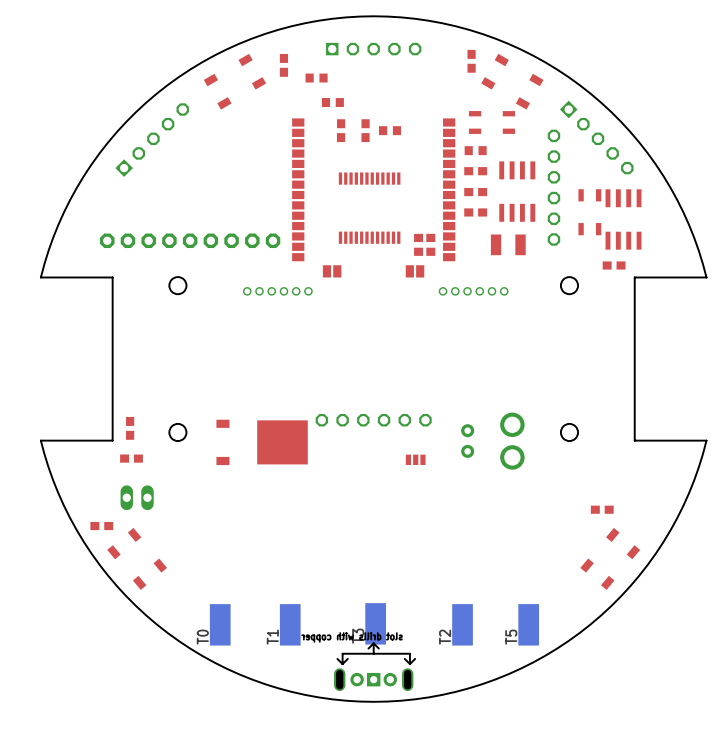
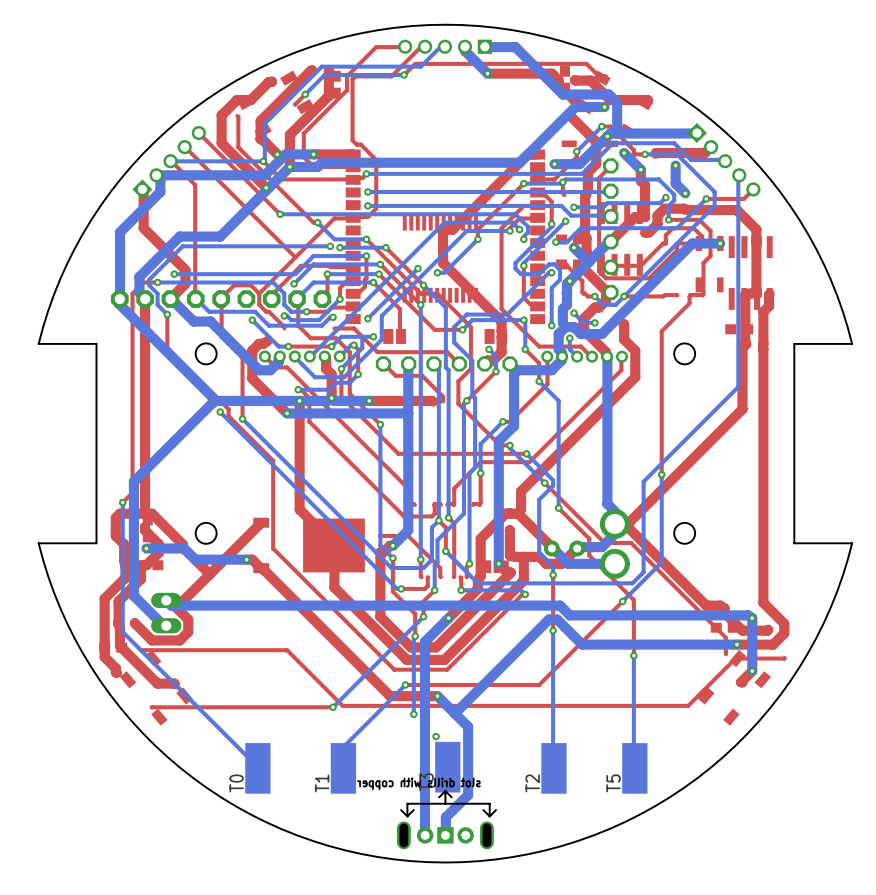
top track: none -> (405, 46) (376, 47) (346, 76) (346, 90) (303, 133) (303, 157) (313, 166) (353, 167)
top track: none -> (425, 46) (420, 47) (391, 76) (355, 76) (352, 79) (352, 140) (356, 144) (360, 144) (376, 159) (376, 208) (367, 217) (334, 218) (259, 293)
bottom track: none -> (445, 46) (440, 47) (420, 66) (321, 66) (264, 123) (263, 161) (170, 161)
part: none -> (445, 46)
bottom track: none -> (464, 46) (465, 51) (487, 73)
bottom track: none -> (484, 46) (515, 47) (562, 94) (608, 94) (617, 102) (617, 133)
part: (373, 49) -> none
top track: none -> (312, 70) (260, 120) (260, 139) (277, 154)
top track: none -> (329, 70) (328, 95) (289, 134) (289, 166)
top track: none -> (487, 73) (551, 73) (558, 80) (558, 84) (578, 104)
via: none -> (487, 73)
top track: none -> (404, 75) (415, 63) (586, 63) (599, 76) (605, 76)
bottom track: none -> (404, 75) (324, 75) (305, 94)
via: none -> (404, 75)
top track: none -> (574, 80) (590, 80) (610, 100) (648, 100)
top track: none -> (271, 81) (268, 81) (250, 100) (236, 100) (221, 115) (221, 143) (266, 187)
top track: none -> (305, 94) (295, 104)
via: none -> (305, 94)
part: (316, 78) -> none
bottom track: none -> (604, 107) (575, 107) (519, 162) (321, 162) (317, 166) (289, 166) (220, 236) (179, 236) (139, 276) (139, 292) (145, 299)
via: none -> (604, 107)
top track: none -> (569, 114) (596, 141) (596, 164) (587, 172) (587, 190) (585, 196) (583, 234) (586, 237) (586, 251) (583, 254) (583, 268) (607, 292) (610, 292) (599, 307) (594, 307) (583, 318) (583, 329) (606, 352) (607, 356)
top track: none -> (237, 115) (238, 147) (313, 222) (317, 222)
top track: none -> (601, 126) (610, 126) (633, 150) (634, 153) (645, 154)
bottom track: none -> (601, 126) (576, 151)
via: none -> (601, 126)
part: (332, 102) -> none
top track: none -> (198, 133) (280, 214)
bottom track: none -> (696, 133) (610, 133) (579, 164) (554, 164)
via: none -> (607, 136)
top track: none -> (184, 147) (295, 257)
top track: none -> (711, 147) (704, 153) (655, 153)
top track: none -> (576, 151) (576, 157) (554, 179) (537, 179)
via: none -> (576, 151)
bottom track: none -> (624, 153) (640, 169)
via: none -> (624, 153)
via: none -> (277, 154)
top track: none -> (313, 154) (353, 154)
bottom track: none -> (313, 154) (285, 154) (264, 175) (156, 175) (160, 179) (160, 191) (119, 232) (118, 303) (216, 400)
via: none -> (313, 154)
top track: none -> (537, 154) (528, 154) (452, 229) (442, 231) (443, 263) (501, 321) (501, 352) (493, 360) (487, 360) (484, 363)
bottom track: none -> (645, 154) (677, 154) (714, 191) (714, 205) (615, 304) (603, 304) (594, 296)
via: none -> (645, 154)
part: none -> (723, 159)
top track: none -> (170, 161) (195, 185) (195, 299)
bottom track: none -> (725, 161) (690, 159) (674, 143) (612, 143) (582, 173) (366, 173)
top track: none -> (263, 161) (281, 179) (353, 179) (353, 178) (362, 178) (366, 173)
via: none -> (263, 161)
part: none -> (169, 162)
part: (341, 130) -> none
part: (365, 130) -> none
part: (390, 130) -> none
via: none -> (554, 164)
top track: none -> (610, 165) (599, 178) (599, 271) (606, 278) (649, 278) (677, 250) (677, 243) (689, 243)
bottom track: none -> (675, 165) (675, 183) (685, 193)
via: none -> (675, 165)
via: none -> (289, 166)
top track: none -> (640, 169) (640, 180) (645, 185) (645, 217) (635, 217) (610, 241)
via: none -> (640, 169)
part: (596, 137) -> none
via: none -> (366, 173)
bottom track: none -> (739, 175) (738, 386) (643, 481) (643, 572) (632, 583) (477, 583) (445, 551)
part: (152, 140) -> none
top track: none -> (562, 182) (564, 195)
via: none -> (562, 182)
top track: none -> (523, 183) (477, 229) (477, 239)
bottom track: none -> (523, 183) (561, 183) (565, 179) (658, 179) (674, 194) (674, 200) (668, 205) (668, 219)
via: none -> (523, 183)
via: none -> (266, 187)
part: (475, 150) -> none
top track: none -> (142, 189) (143, 228) (185, 269) (185, 283) (170, 299)
top track: none -> (753, 189) (743, 198) (706, 198)
bottom track: none -> (610, 191) (367, 191)
via: none -> (367, 191)
top track: none -> (537, 192) (543, 193) (551, 201) (551, 224)
via: none -> (685, 193)
bottom track: none -> (665, 197) (660, 203) (607, 203) (603, 207) (573, 207)
via: none -> (665, 197)
bottom track: none -> (706, 198) (677, 228) (580, 228) (567, 242) (555, 242)
via: none -> (706, 198)
top track: none -> (537, 205) (523, 205) (501, 228) (501, 308) (539, 346) (580, 346) (592, 356)
bottom track: none -> (367, 205) (561, 205) (571, 215) (610, 216)
via: none -> (367, 205)
via: none -> (573, 207)
bottom track: none -> (280, 214) (515, 214) (528, 226) (528, 232) (523, 239)
via: none -> (280, 214)
part: (475, 171) -> none
top track: none -> (537, 217) (519, 218) (509, 228) (509, 230)
top track: none -> (668, 219) (699, 219) (710, 230) (710, 256) (703, 263) (702, 295) (689, 295) (689, 303) (661, 331) (661, 474)
via: none -> (668, 219)
bottom track: none -> (565, 221) (523, 263) (523, 265)
via: none -> (565, 221)
bottom track: none -> (317, 222) (334, 239) (366, 239)
via: none -> (317, 222)
bottom track: none -> (551, 224) (551, 226) (515, 263) (515, 268) (521, 274) (539, 274) (548, 264) (554, 264) (560, 269) (560, 279) (551, 288) (551, 325)
via: none -> (551, 224)
bottom track: none -> (519, 229) (512, 222) (444, 222) (309, 356)
via: none -> (519, 229)
bottom track: none -> (509, 230) (466, 230) (381, 315) (381, 339) (344, 377) (314, 377) (294, 356)
via: none -> (509, 230)
top track: none -> (645, 232) (649, 232) (657, 224) (657, 215) (664, 208) (736, 210) (756, 229) (757, 293) (745, 295) (746, 344) (742, 347) (742, 409) (629, 522) (624, 523) (706, 605) (720, 605) (724, 608)
part position: (553, 187) -> (610, 229)
top track: none -> (366, 239) (420, 293) (437, 293) (470, 327) (470, 368) (458, 381) (458, 403) (500, 445) (509, 445)
via: none -> (366, 239)
bottom track: none -> (477, 239) (444, 272) (437, 272)
via: none -> (477, 239)
via: none -> (523, 239)
bottom track: none -> (610, 241) (567, 285) (567, 304) (562, 308) (562, 322) (565, 327)
via: none -> (555, 242)
top track: none -> (702, 243) (702, 236) (693, 228) (672, 228) (665, 235) (665, 243) (663, 243) (640, 265) (610, 267)
bottom track: none -> (720, 243) (692, 243) (601, 334) (580, 334) (573, 327) (565, 327)
via: none -> (720, 243)
bottom track: none -> (330, 246) (182, 246) (149, 279) (149, 285) (157, 293) (157, 304) (167, 314)
via: none -> (330, 246)
via: none -> (340, 247)
top track: none -> (385, 247) (423, 285)
bottom track: none -> (385, 247) (340, 247)
via: none -> (385, 247)
bottom track: none -> (573, 247) (588, 262)
via: none -> (573, 247)
top track: none -> (366, 256) (365, 286) (358, 293) (353, 293)
bottom track: none -> (366, 256) (313, 256) (295, 274) (174, 274)
via: none -> (366, 256)
top track: none -> (380, 264) (420, 304)
bottom track: none -> (380, 264) (313, 264) (294, 283)
via: none -> (380, 264)
top track: none -> (566, 264) (582, 281) (583, 293) (587, 296) (594, 296)
top track: none -> (523, 265) (523, 297) (532, 306) (537, 306)
via: none -> (523, 265)
top track: none -> (353, 268) (301, 265) (271, 295) (271, 299)
bottom track: none -> (418, 268) (367, 318)
via: none -> (418, 268)
via: none -> (437, 272)
bottom track: none -> (551, 272) (548, 272) (507, 314) (466, 314) (454, 327) (454, 342) (472, 360) (472, 395) (475, 398) (475, 467) (469, 473) (469, 563)
via: none -> (551, 272)
via: none -> (174, 274)
top track: none -> (327, 274) (327, 293) (322, 299)
via: none -> (327, 274)
top track: none -> (379, 274) (434, 329) (462, 329)
bottom track: none -> (379, 274) (327, 274)
via: none -> (379, 274)
top track: none -> (353, 281) (346, 281) (340, 288) (340, 299)
via: none -> (569, 281)
top track: none -> (157, 282) (143, 282) (132, 293) (132, 492) (122, 502)
bottom track: none -> (157, 282) (273, 282) (284, 293) (284, 304) (291, 311) (306, 311)
via: none -> (157, 282)
top track: none -> (373, 282) (399, 308) (400, 336)
bottom track: none -> (373, 282) (313, 282) (297, 299)
via: none -> (373, 282)
via: none -> (294, 283)
bottom track: none -> (423, 285) (445, 307) (445, 367) (448, 370) (448, 517)
via: none -> (423, 285)
top track: none -> (259, 293) (259, 304) (266, 311) (268, 311) (284, 328)
top track: none -> (259, 293) (250, 285) (234, 285) (221, 299) (221, 336) (242, 357) (242, 419)
top track: none -> (769, 293) (768, 306) (763, 311) (763, 602) (784, 623) (784, 633) (773, 644) (736, 644)
top track: none -> (677, 295) (624, 296)
via: none -> (594, 296)
via: none -> (624, 296)
top track: none -> (145, 299) (145, 513)
bottom track: none -> (170, 299) (193, 321) (210, 321) (259, 370) (270, 370) (278, 361) (279, 356)
bottom track: none -> (195, 299) (209, 311) (255, 311) (268, 325) (321, 325) (330, 317) (333, 317)
top track: none -> (297, 299) (298, 325) (310, 338) (335, 338) (349, 352) (349, 393) (380, 424)
bottom track: none -> (340, 299) (319, 320) (291, 320) (284, 315)
via: none -> (340, 299)
part: (418, 244) -> none
part: (430, 244) -> none
part: (496, 244) -> none
part: (520, 244) -> none
bottom track: none -> (420, 304) (420, 559)
via: none -> (420, 304)
top track: none -> (353, 306) (331, 307) (327, 311) (306, 311)
via: none -> (306, 311)
bottom track: none -> (573, 313) (583, 322) (594, 322)
via: none -> (573, 313)
top track: none -> (167, 314) (167, 347) (228, 409) (228, 416) (273, 460) (273, 548) (394, 669) (447, 669) (522, 594) (525, 594)
via: none -> (167, 314)
via: none -> (284, 315)
via: none -> (333, 317)
via: none -> (367, 318)
bottom track: none -> (252, 320) (278, 346) (288, 346)
via: none -> (252, 320)
via: none -> (523, 320)
via: none -> (594, 322)
top track: none -> (623, 323) (624, 339) (635, 350) (635, 377) (521, 491) (521, 509) (518, 513)
via: none -> (551, 325)
bottom track: none -> (565, 327) (558, 334) (558, 349) (561, 352) (561, 360) (551, 370) (516, 370)
top track: none -> (334, 328) (353, 328) (377, 352) (447, 352) (459, 363)
bottom track: none -> (462, 329) (472, 320) (523, 320) (525, 349)
via: none -> (462, 329)
bottom track: none -> (362, 336) (362, 347) (341, 368)
bottom track: none -> (373, 336) (341, 336) (331, 346)
via: none -> (373, 336)
bottom track: none -> (569, 338) (569, 349) (577, 356)
via: none -> (569, 338)
top track: none -> (267, 341) (259, 343) (252, 350) (252, 378) (287, 413)
board edge: (88, 277) (112, 277) (112, 440) (88, 440) -> (96, 343) (96, 543)
board edge: (659, 277) (634, 277) (634, 440) (659, 440) -> (794, 343) (794, 543)
top track: none -> (353, 345) (358, 349) (358, 374)
bottom track: none -> (353, 345) (351, 345) (339, 356)
via: none -> (353, 345)
via: none -> (288, 346)
top track: none -> (331, 346) (288, 346)
via: none -> (331, 346)
bottom track: none -> (489, 349) (496, 356) (496, 371)
via: none -> (489, 349)
top track: none -> (525, 349) (539, 363) (539, 381)
via: none -> (525, 349)
top track: none -> (264, 356) (275, 367) (287, 367) (408, 488) (408, 504) (414, 504)
part: none -> (302, 356)
top track: none -> (324, 356) (326, 368) (331, 374) (331, 398)
top track: none -> (547, 356) (547, 384) (509, 421) (502, 421)
part: none -> (584, 356)
bottom track: none -> (607, 356) (607, 503) (624, 523) (601, 547) (577, 548)
top track: none -> (621, 356) (621, 370) (529, 462) (480, 462) (454, 488) (453, 504) (447, 504)
part: (277, 291) -> none
part: (473, 291) -> none
top track: none -> (383, 363) (395, 375) (422, 375) (443, 396) (442, 401)
bottom track: none -> (408, 363) (408, 530) (392, 545)
bottom track: none -> (434, 363) (438, 368) (438, 520) (431, 527) (431, 559) (423, 568) (391, 568) (242, 419)
part: none -> (446, 363)
top track: none -> (341, 368) (341, 396) (398, 453) (526, 453)
via: none -> (341, 368)
bottom track: none -> (516, 370) (514, 374) (514, 425) (498, 441) (498, 563)
top track: none -> (496, 371) (466, 400)
via: none -> (496, 371)
bottom track: none -> (358, 374) (349, 382) (335, 382) (328, 389) (298, 389)
via: none -> (358, 374)
bottom track: none -> (539, 381) (558, 400) (558, 508)
via: none -> (539, 381)
top track: none -> (298, 389) (301, 389) (309, 398) (309, 421) (404, 516) (431, 516) (434, 513) (434, 503) (440, 504)
via: none -> (298, 389)
via: none -> (331, 398)
bottom track: none -> (216, 400) (133, 481) (133, 595) (163, 625) (166, 625)
top track: none -> (299, 400) (299, 509) (334, 545) (334, 587) (406, 659) (444, 659) (523, 580) (523, 556)
via: none -> (299, 400)
top track: none -> (369, 400) (433, 401)
bottom track: none -> (369, 400) (334, 400) (331, 398) (327, 400) (216, 400)
via: none -> (369, 400)
bottom track: none -> (466, 400) (463, 403) (463, 513) (437, 540) (434, 590)
via: none -> (466, 400)
bottom track: none -> (220, 412) (397, 588) (401, 588)
via: none -> (220, 412)
via: none -> (287, 413)
bottom track: none -> (408, 413) (287, 413)
via: none -> (242, 419)
bottom track: none -> (502, 421) (480, 444) (480, 473)
via: none -> (502, 421)
bottom track: none -> (380, 424) (380, 545) (392, 558)
via: none -> (380, 424)
bottom track: none -> (509, 445) (509, 448) (544, 483)
via: none -> (509, 445)
bottom track: none -> (526, 453) (553, 480) (553, 485) (539, 499) (539, 552) (553, 566) (553, 574)
via: none -> (526, 453)
top track: none -> (480, 473) (480, 502) (479, 504) (473, 504)
via: none -> (480, 473)
bottom track: none -> (661, 474) (661, 562) (622, 601)
via: none -> (661, 474)
top track: none -> (544, 483) (604, 542) (631, 542) (725, 637) (726, 654)
via: none -> (544, 483)
bottom track: none -> (122, 502) (122, 632) (257, 768)
via: none -> (122, 502)
top track: none -> (558, 508) (589, 538) (589, 555) (633, 600) (633, 655)
via: none -> (558, 508)
top track: none -> (518, 513) (505, 513) (480, 538) (480, 576) (477, 581) (477, 588) (448, 618)
top track: none -> (518, 513) (551, 548)
top track: none -> (448, 517) (454, 523) (453, 577)
via: none -> (448, 517)
part: (373, 420) -> none
top track: none -> (438, 520) (445, 527) (445, 551)
via: none -> (438, 520)
top track: none -> (261, 522) (179, 604) (166, 600) (170, 601) (188, 619) (188, 632) (179, 640) (152, 640) (134, 623)
top track: none -> (144, 526) (145, 530) (158, 544) (158, 552) (146, 565) (142, 565) (140, 579) (118, 601) (119, 646) (157, 683) (174, 684)
top track: none -> (509, 530) (509, 555) (539, 556) (546, 563) (561, 563) (577, 548)
top track: none -> (380, 535) (408, 535) (440, 568) (440, 577)
part rotation: 0° (467, 441) -> 90° clockwise (564, 548)
top track: none -> (392, 545) (380, 552) (380, 616) (411, 647) (436, 647) (510, 572) (498, 563)
via: none -> (392, 545)
bottom track: none -> (146, 548) (184, 548) (195, 559) (246, 559)
via: none -> (146, 548)
bottom track: none -> (551, 548) (568, 563) (624, 563)
via: none -> (445, 551)
top track: none -> (392, 558) (392, 591) (415, 613) (415, 636)
via: none -> (392, 558)
top track: none -> (246, 559) (252, 559) (264, 570) (390, 696) (437, 696)
via: none -> (246, 559)
top track: none -> (420, 559) (421, 577)
via: none -> (420, 559)
top track: none -> (469, 563) (466, 566) (466, 577)
via: none -> (469, 563)
via: none -> (498, 563)
top track: none -> (209, 574) (152, 513) (119, 513) (115, 517) (115, 535) (124, 544) (125, 577) (104, 598) (104, 657) (115, 668) (117, 672)
top track: none -> (553, 574) (553, 630)
via: none -> (553, 574)
top track: none -> (427, 577) (427, 586) (424, 588) (401, 588)
top track: none -> (460, 577) (461, 590)
via: none -> (401, 588)
top track: none -> (434, 590) (423, 601) (423, 616)
via: none -> (434, 590)
bottom track: none -> (461, 590) (521, 590) (525, 594)
via: none -> (461, 590)
via: none -> (525, 594)
bottom track: none -> (166, 600) (171, 605) (560, 605) (569, 615) (748, 615) (752, 618) (752, 671)
top track: none -> (622, 601) (539, 685) (405, 685)
via: none -> (622, 601)
top track: none -> (724, 608) (724, 612) (742, 630) (768, 629)
part rotation: 0° (137, 497) -> 90° clockwise (166, 613)
bottom track: none -> (423, 616) (333, 707)
via: none -> (423, 616)
bottom track: none -> (448, 618) (424, 641) (425, 835)
via: none -> (448, 618)
via: none -> (752, 618)
bottom track: none -> (553, 630) (553, 768)
via: none -> (553, 630)
bottom track: none -> (415, 636) (413, 714)
via: none -> (415, 636)
bottom track: none -> (736, 644) (582, 644) (557, 619) (548, 619) (454, 713)
via: none -> (736, 644)
top track: none -> (140, 649) (287, 650) (342, 705) (688, 705) (735, 658) (784, 658)
bottom track: none -> (633, 655) (634, 768)
via: none -> (633, 655)
top track: none -> (752, 671) (742, 682)
via: none -> (752, 671)
bottom track: none -> (405, 685) (344, 746) (343, 768)
via: none -> (405, 685)
bottom track: none -> (437, 696) (468, 726) (468, 795) (445, 817) (445, 835)
via: none -> (437, 696)
top track: none -> (333, 707) (151, 707)
via: none -> (333, 707)
via: none -> (413, 714)
via: none -> (436, 736)

